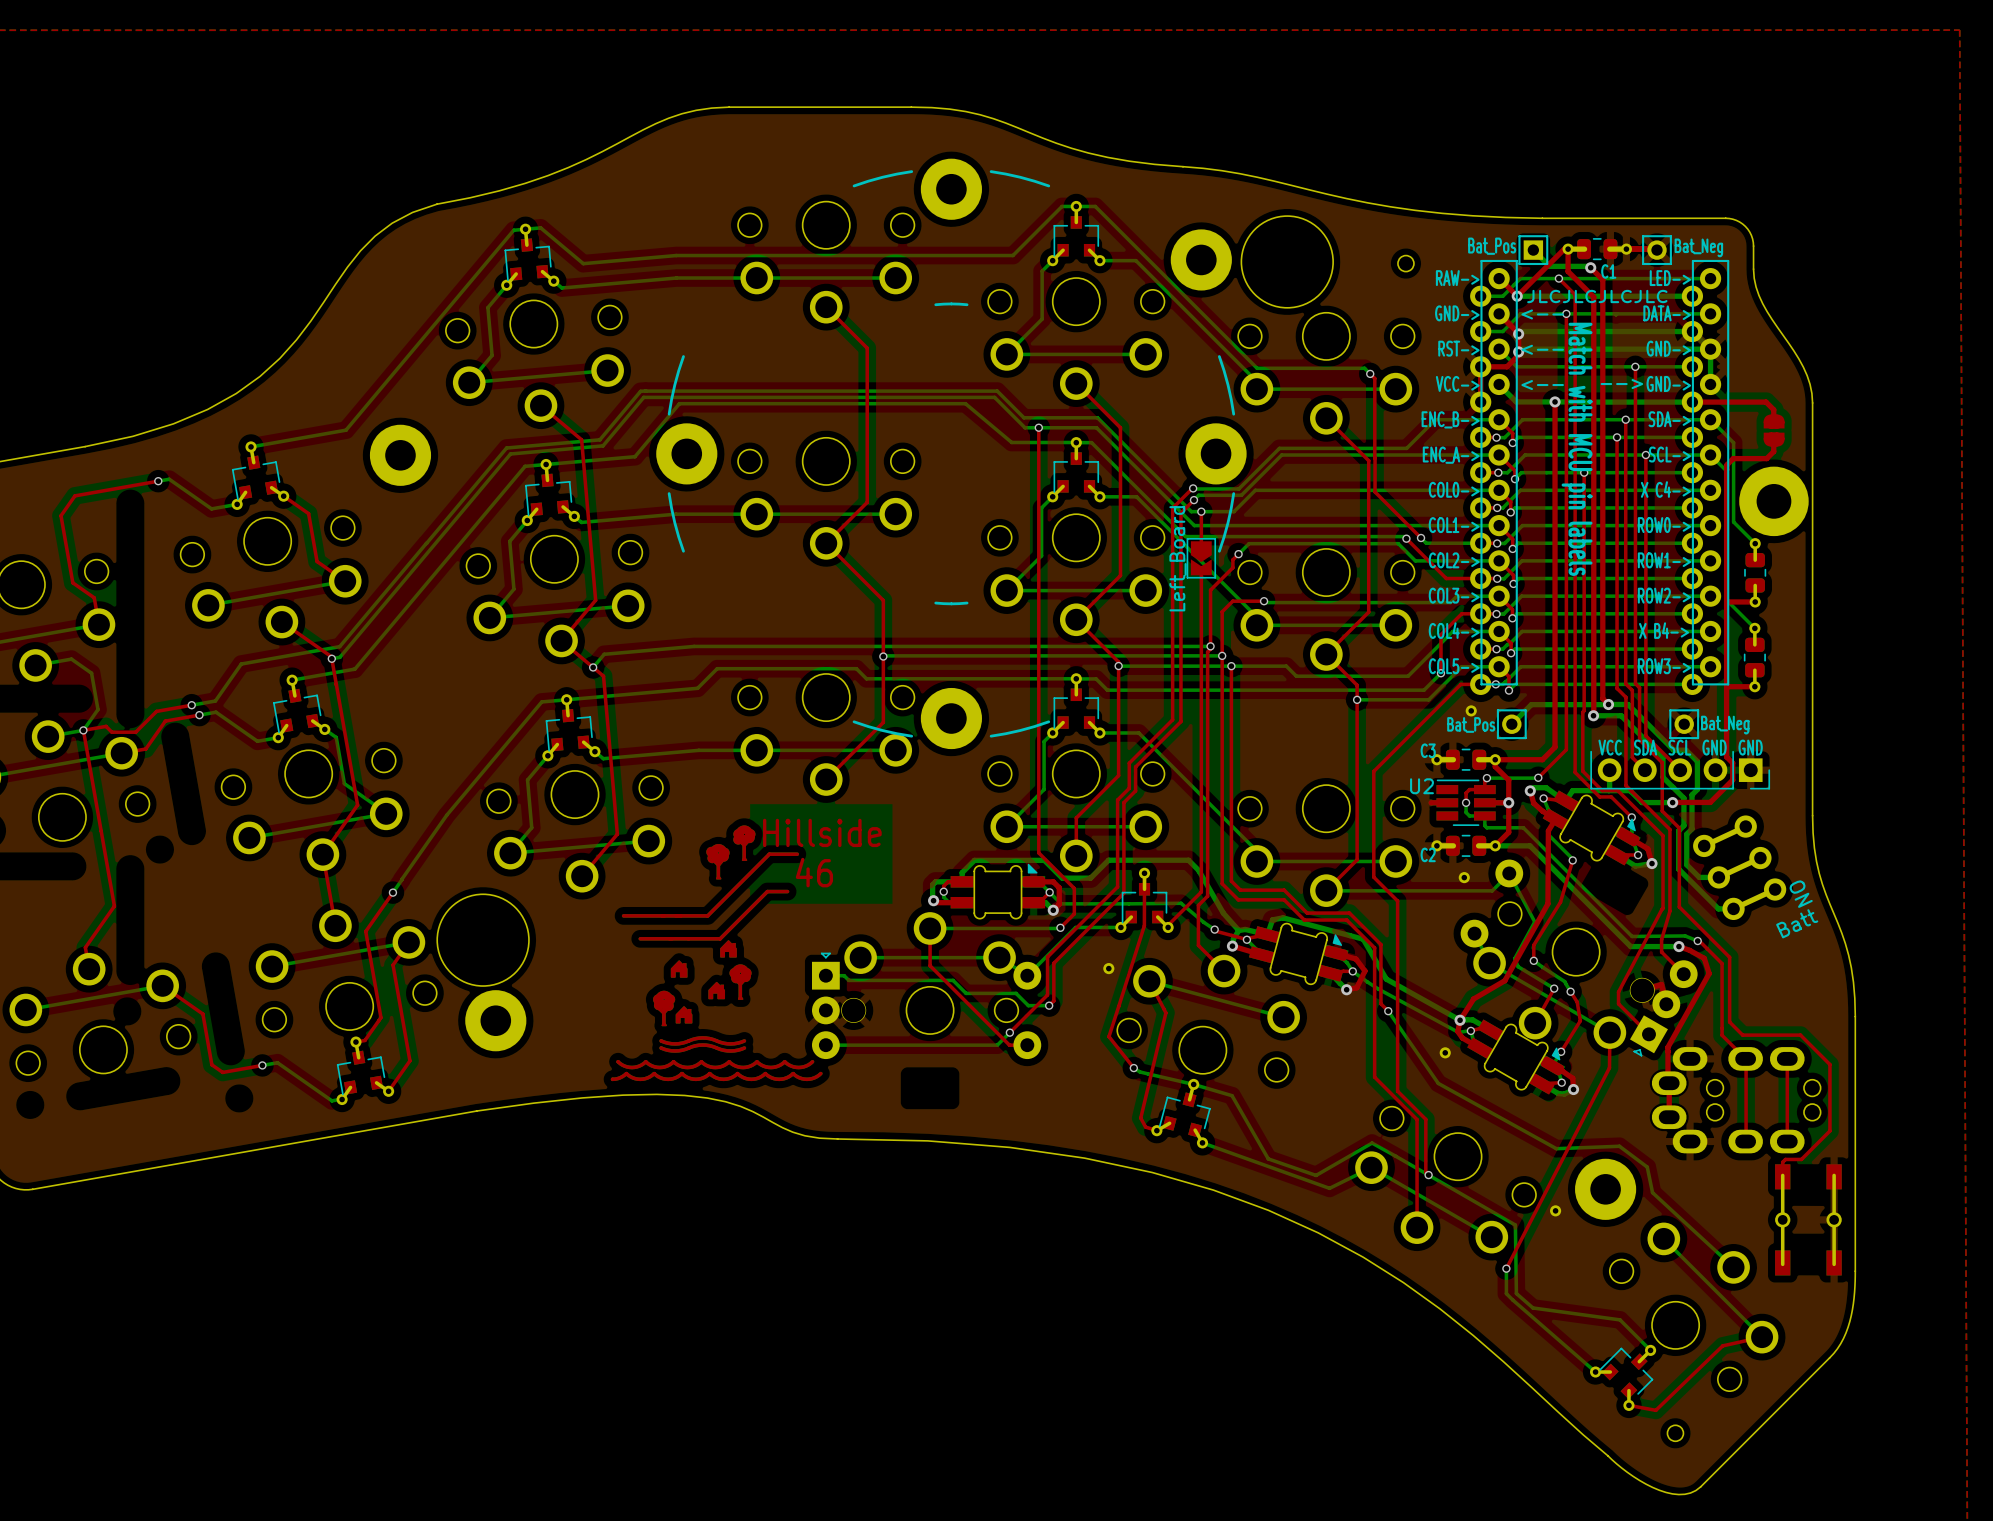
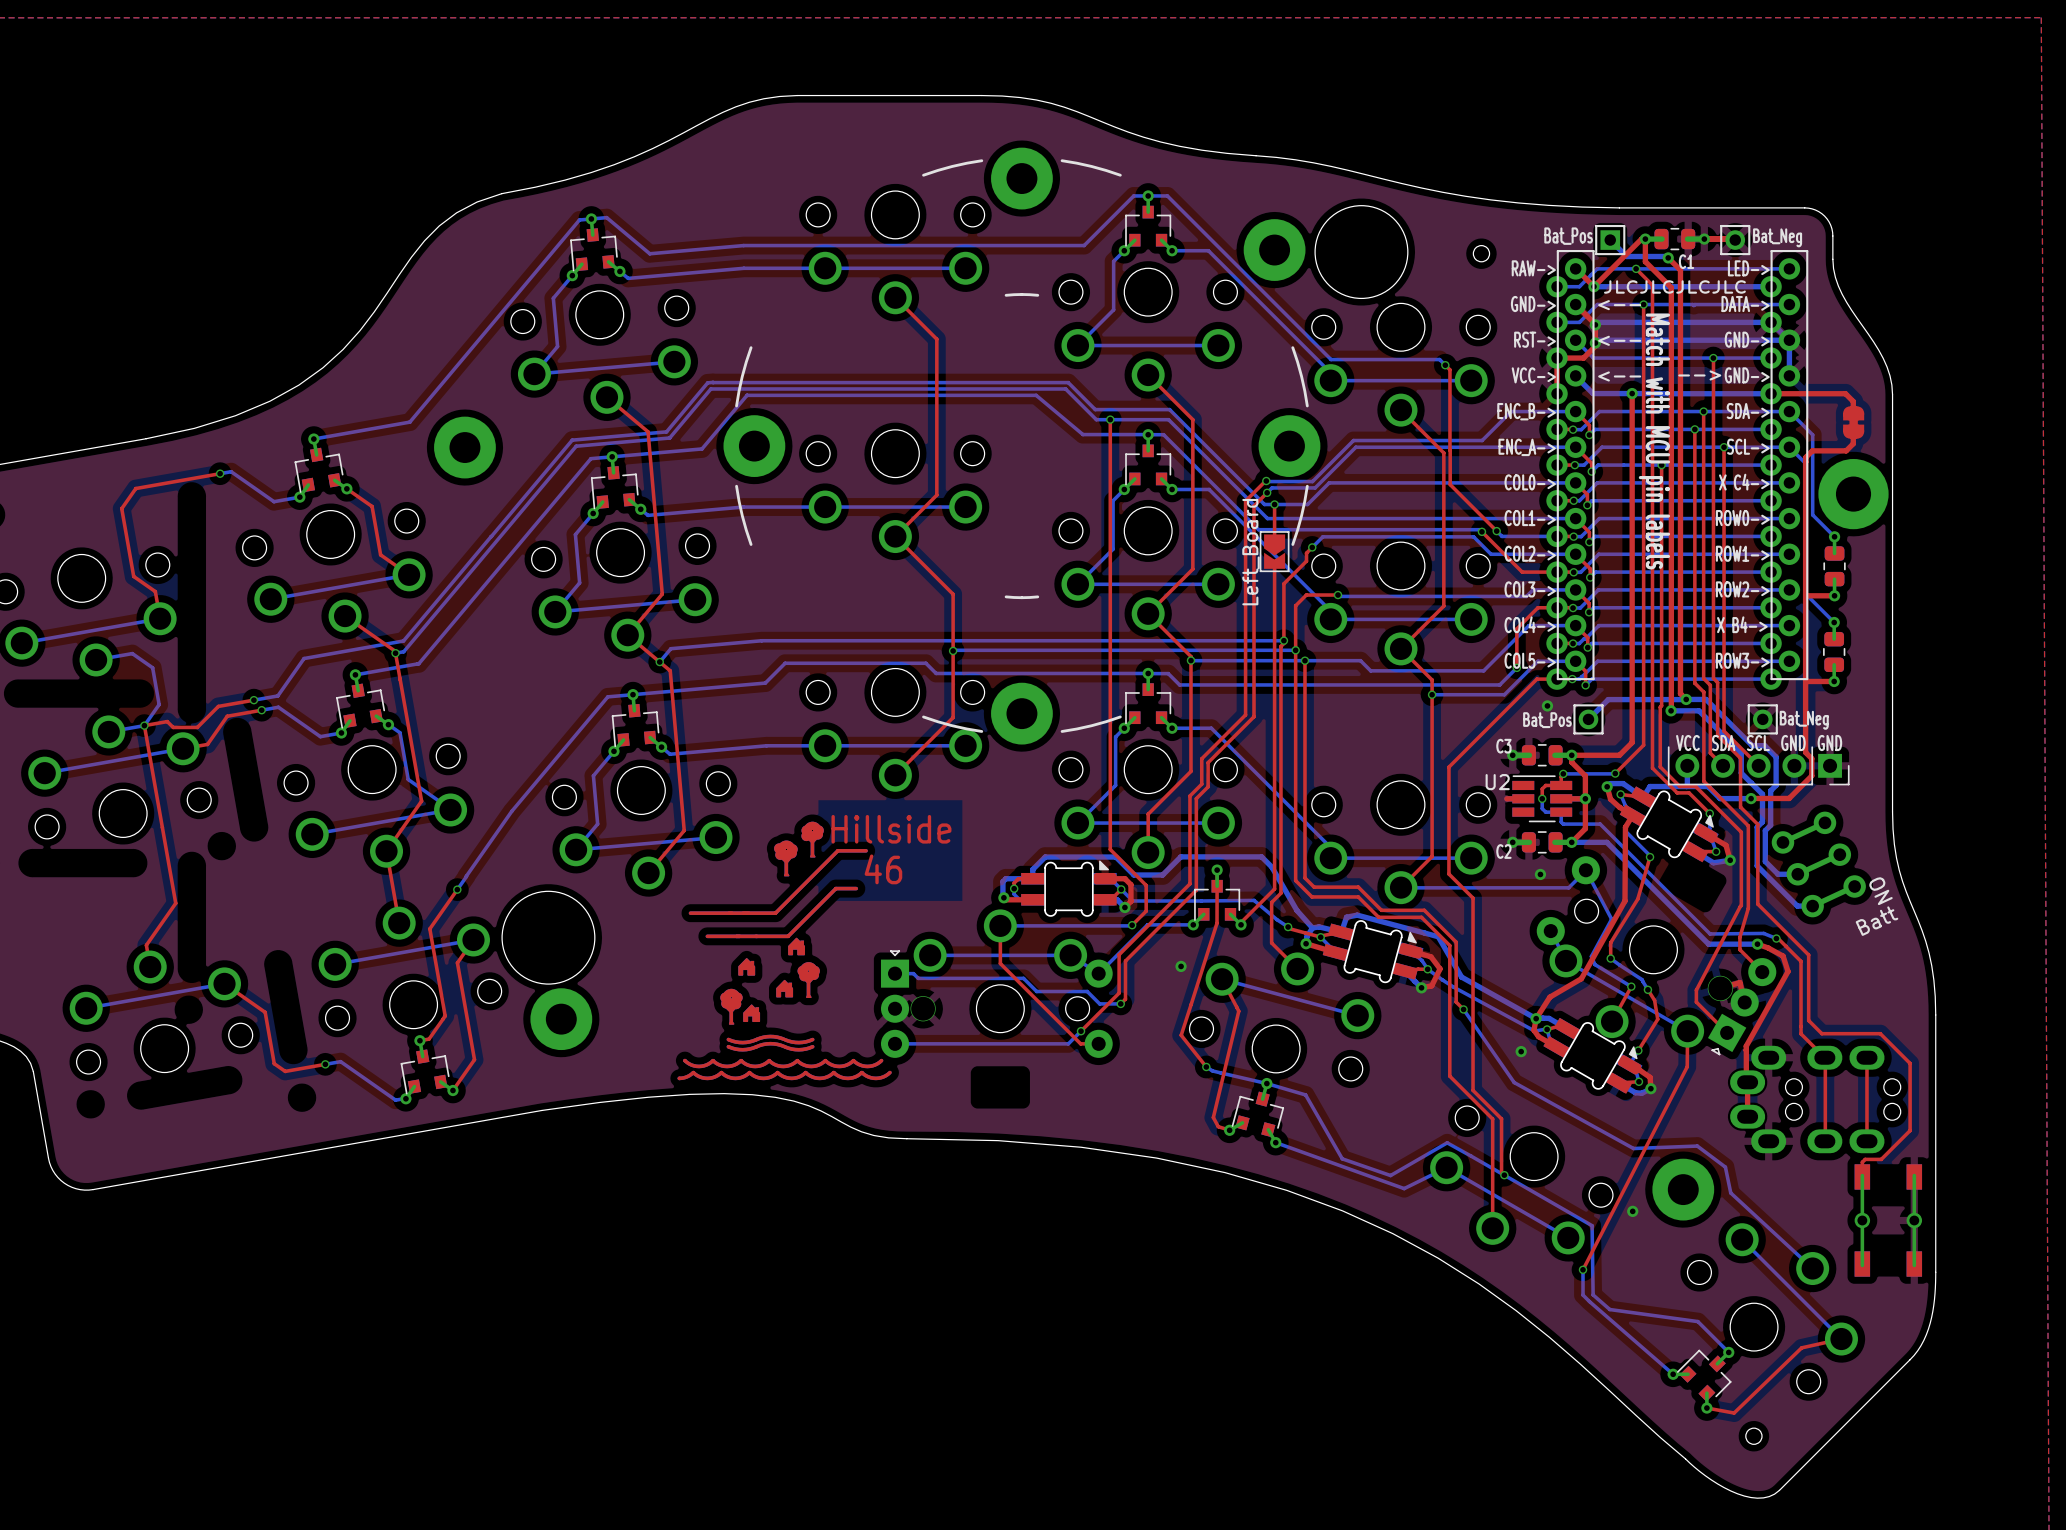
part footprint: [1763, 414, 1785, 447] -> [1843, 406, 1865, 439]

